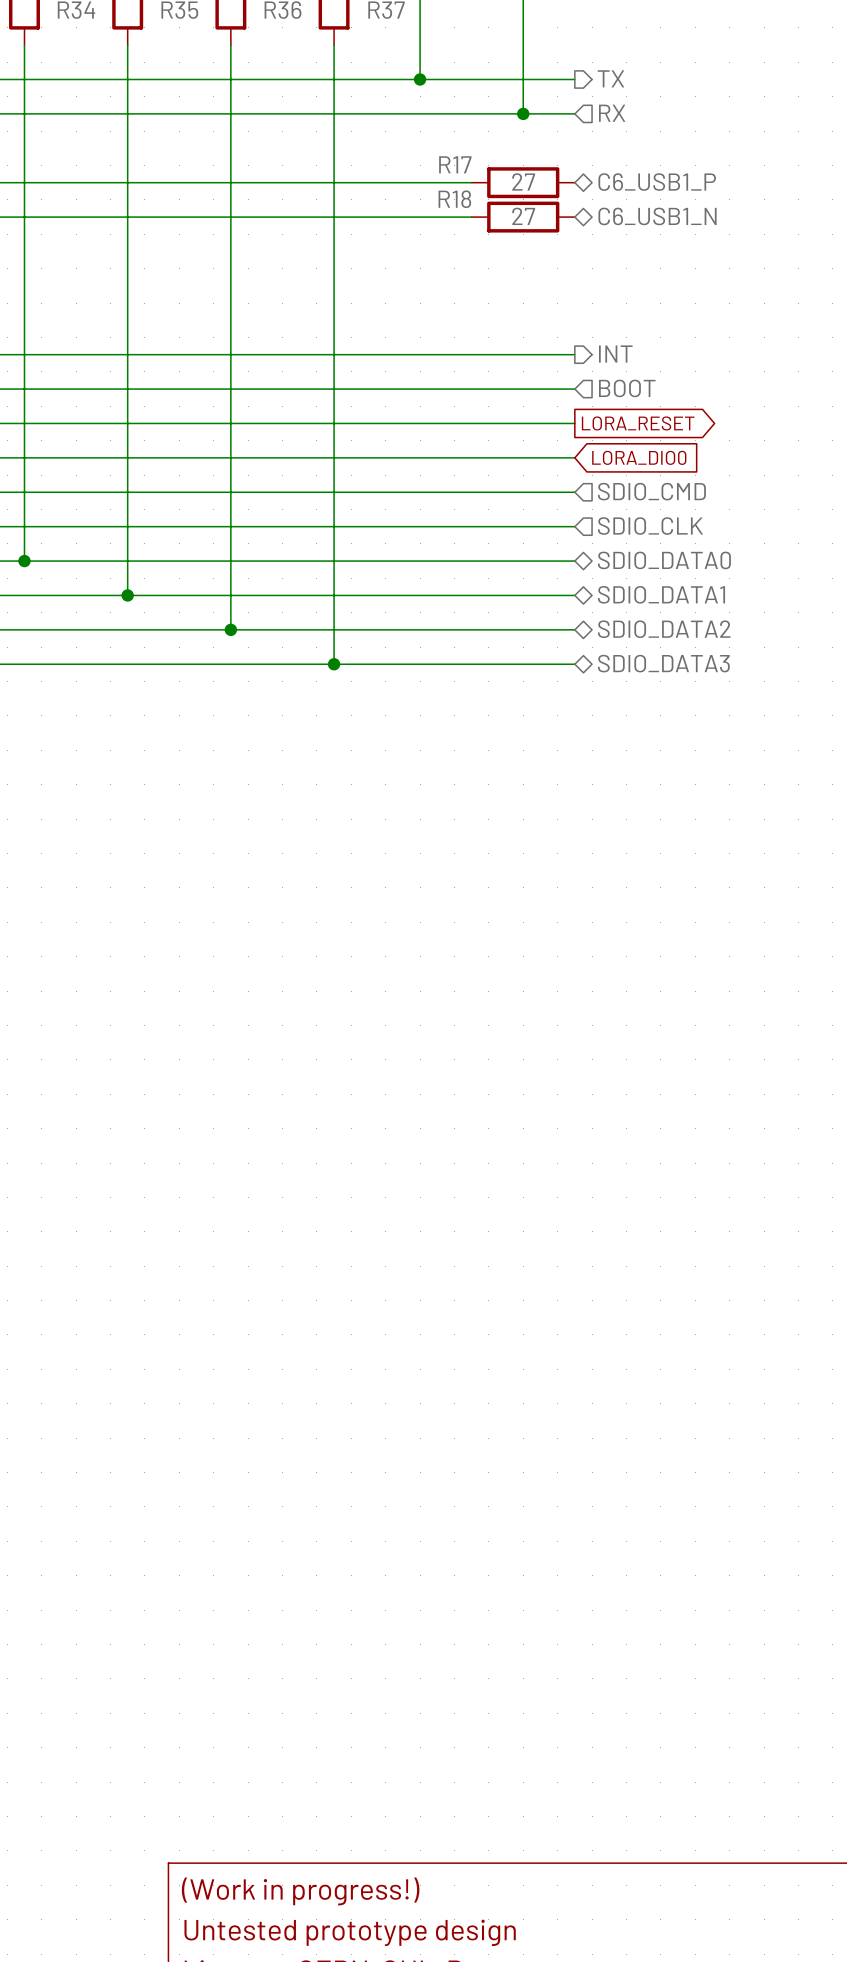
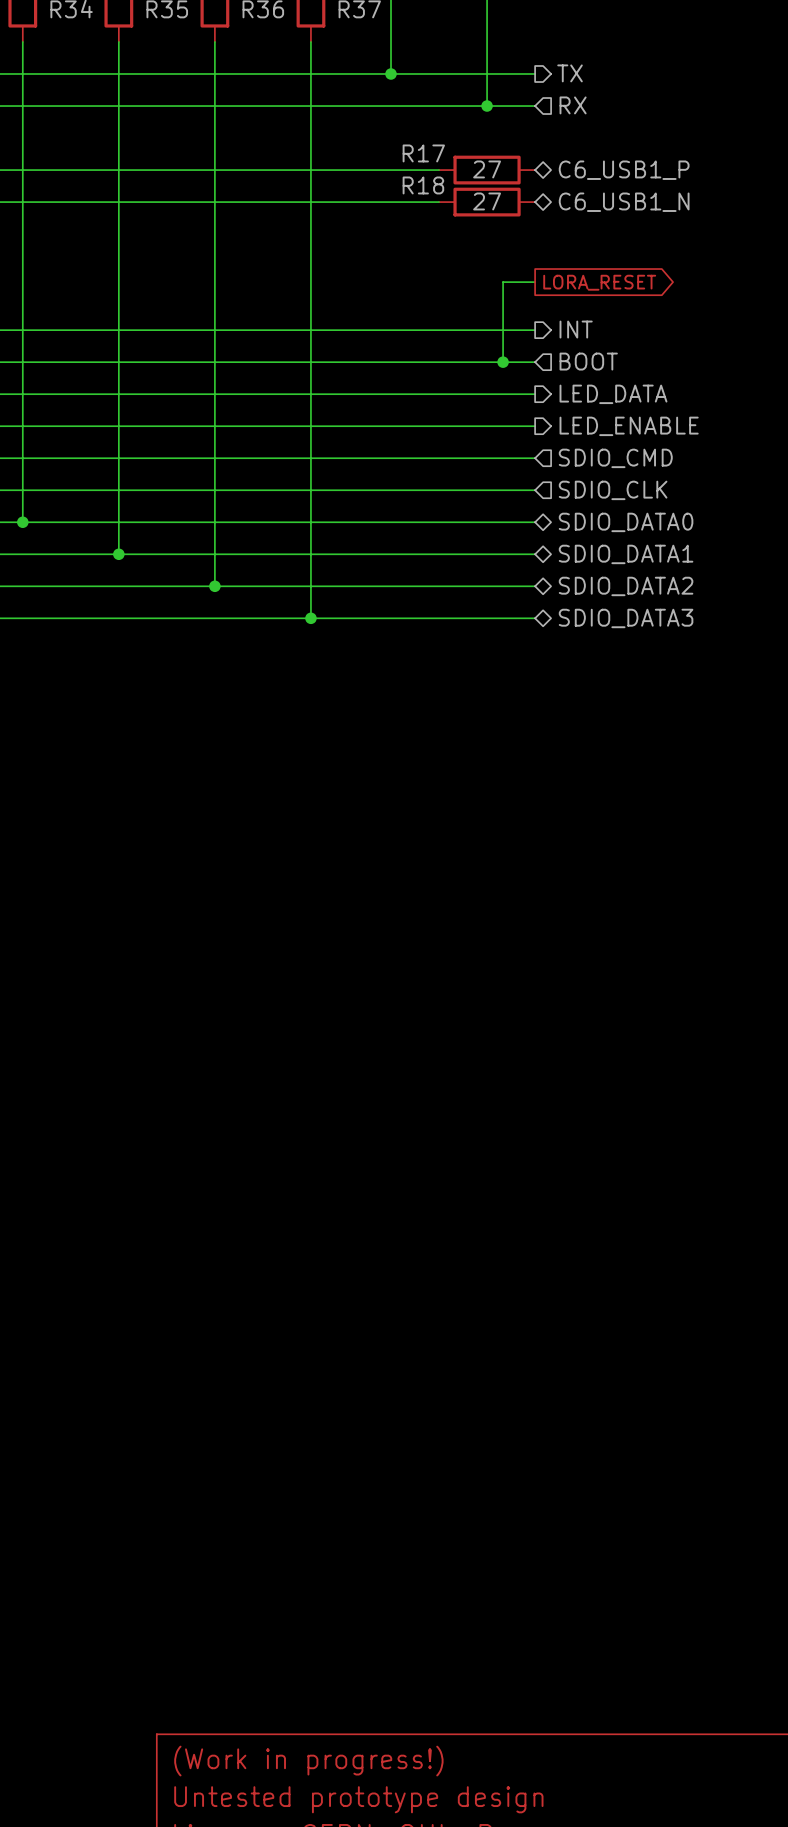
wire: none -> (535, 282) (503, 282) (503, 362)
junction: none -> (503, 362)
hierarchical label: none -> LED_DATA (613, 394)
global label position: LORA_RESET (638, 423) -> LORA_RESET (599, 282)
global label: LORA_DIO0 (639, 457) -> none
hierarchical label: none -> LED_ENABLE (629, 426)

